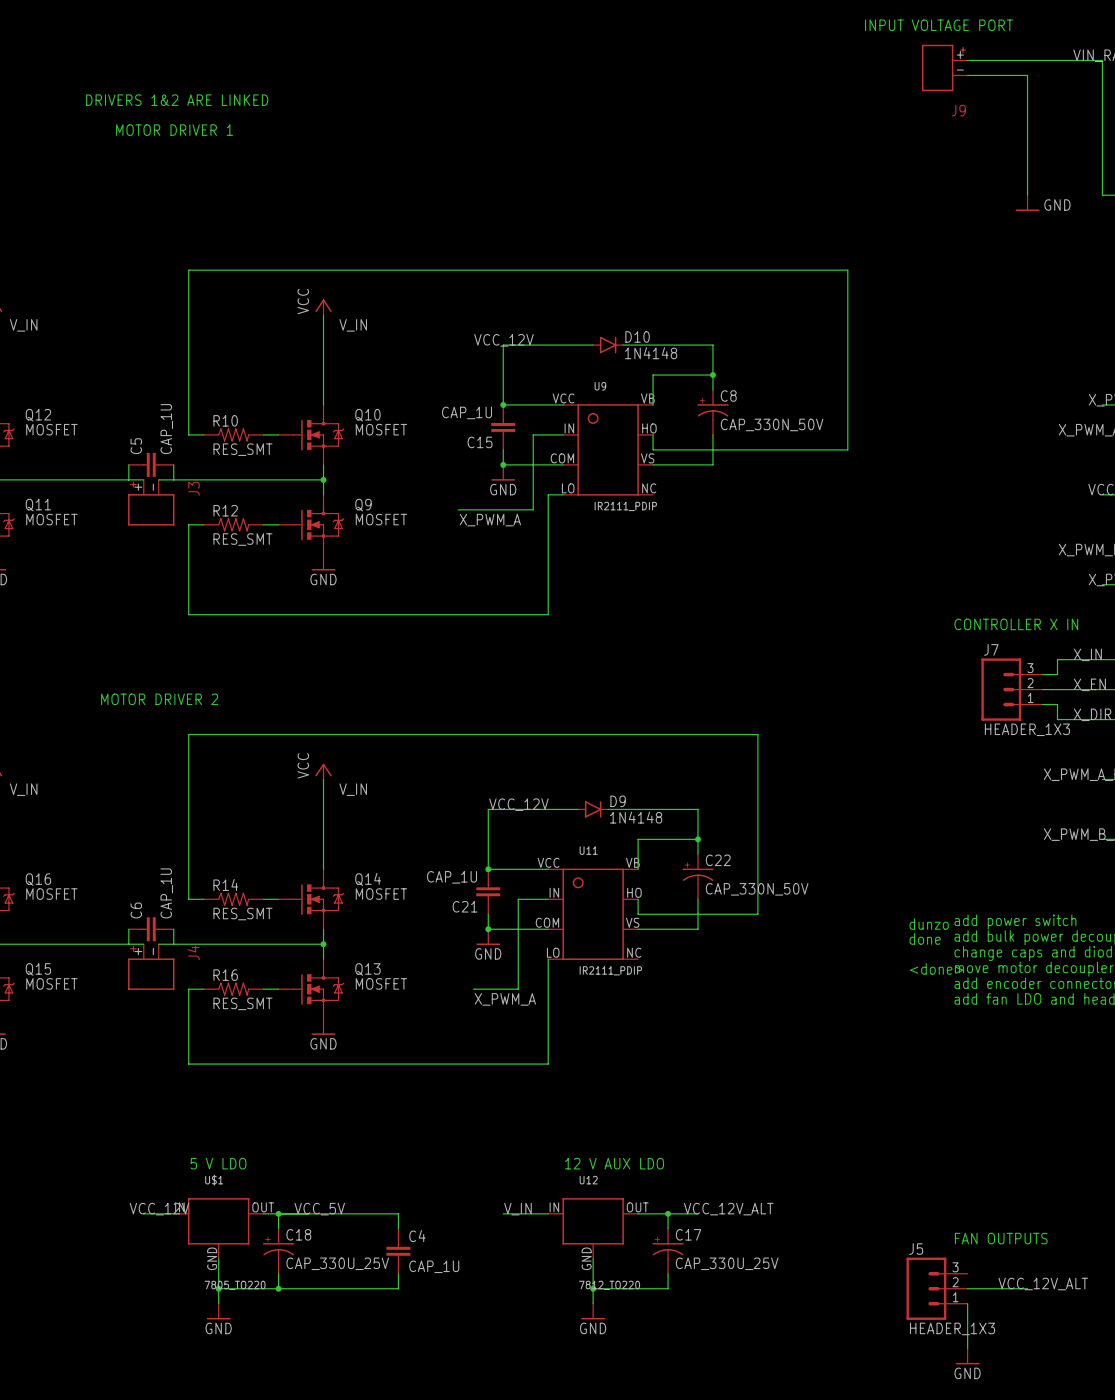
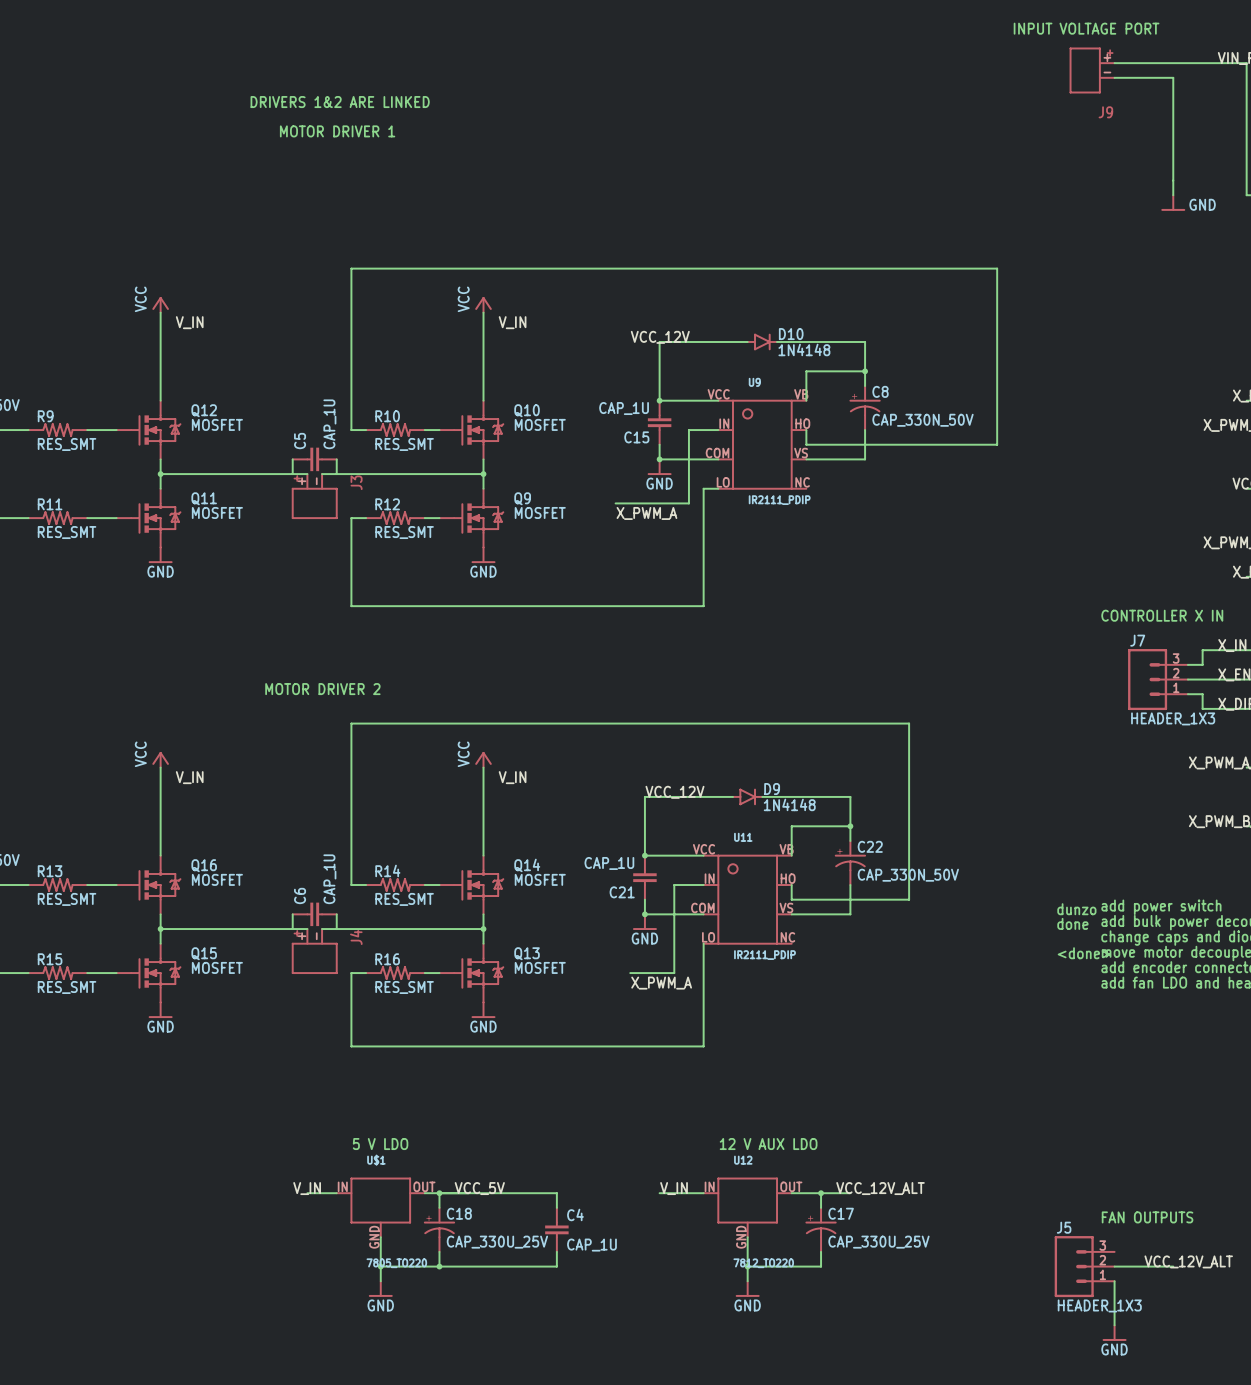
label: VCC_12V (159, 1209) -> V_IN (307, 1188)

